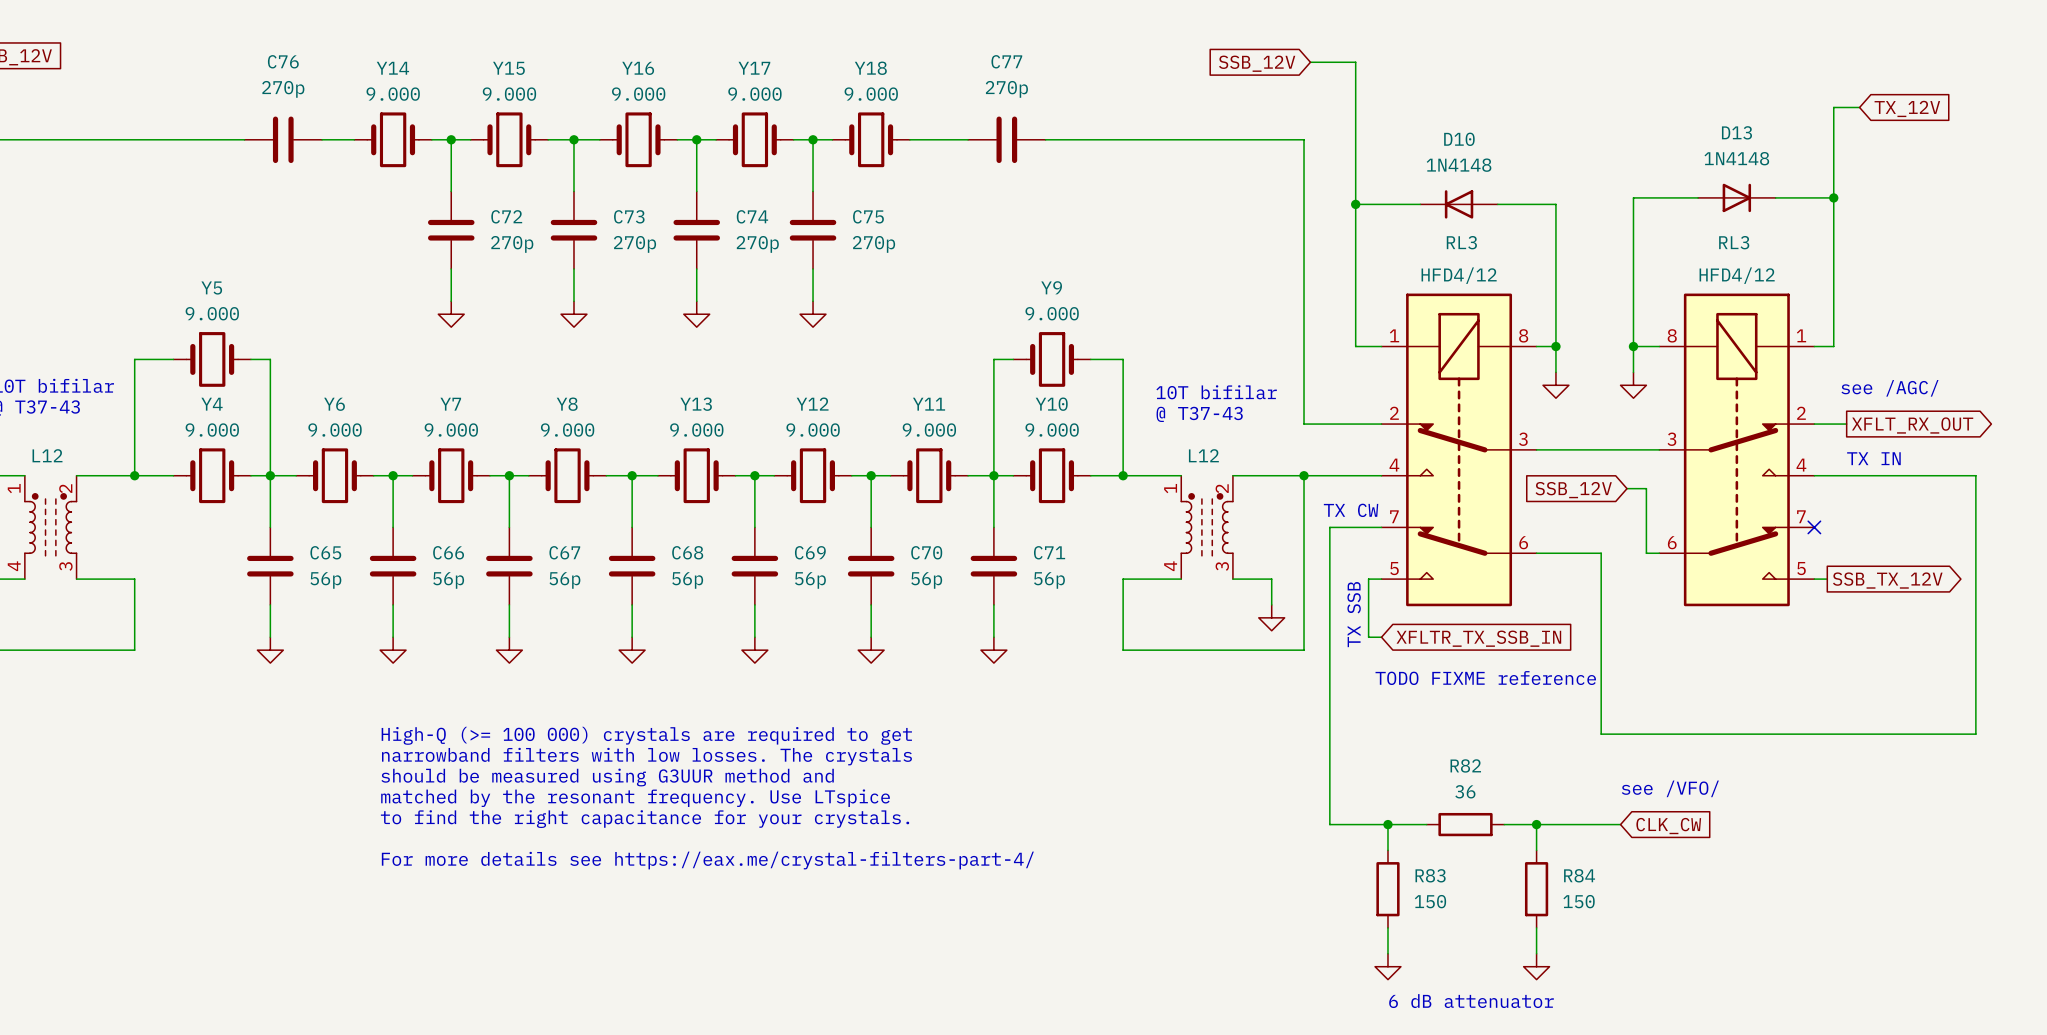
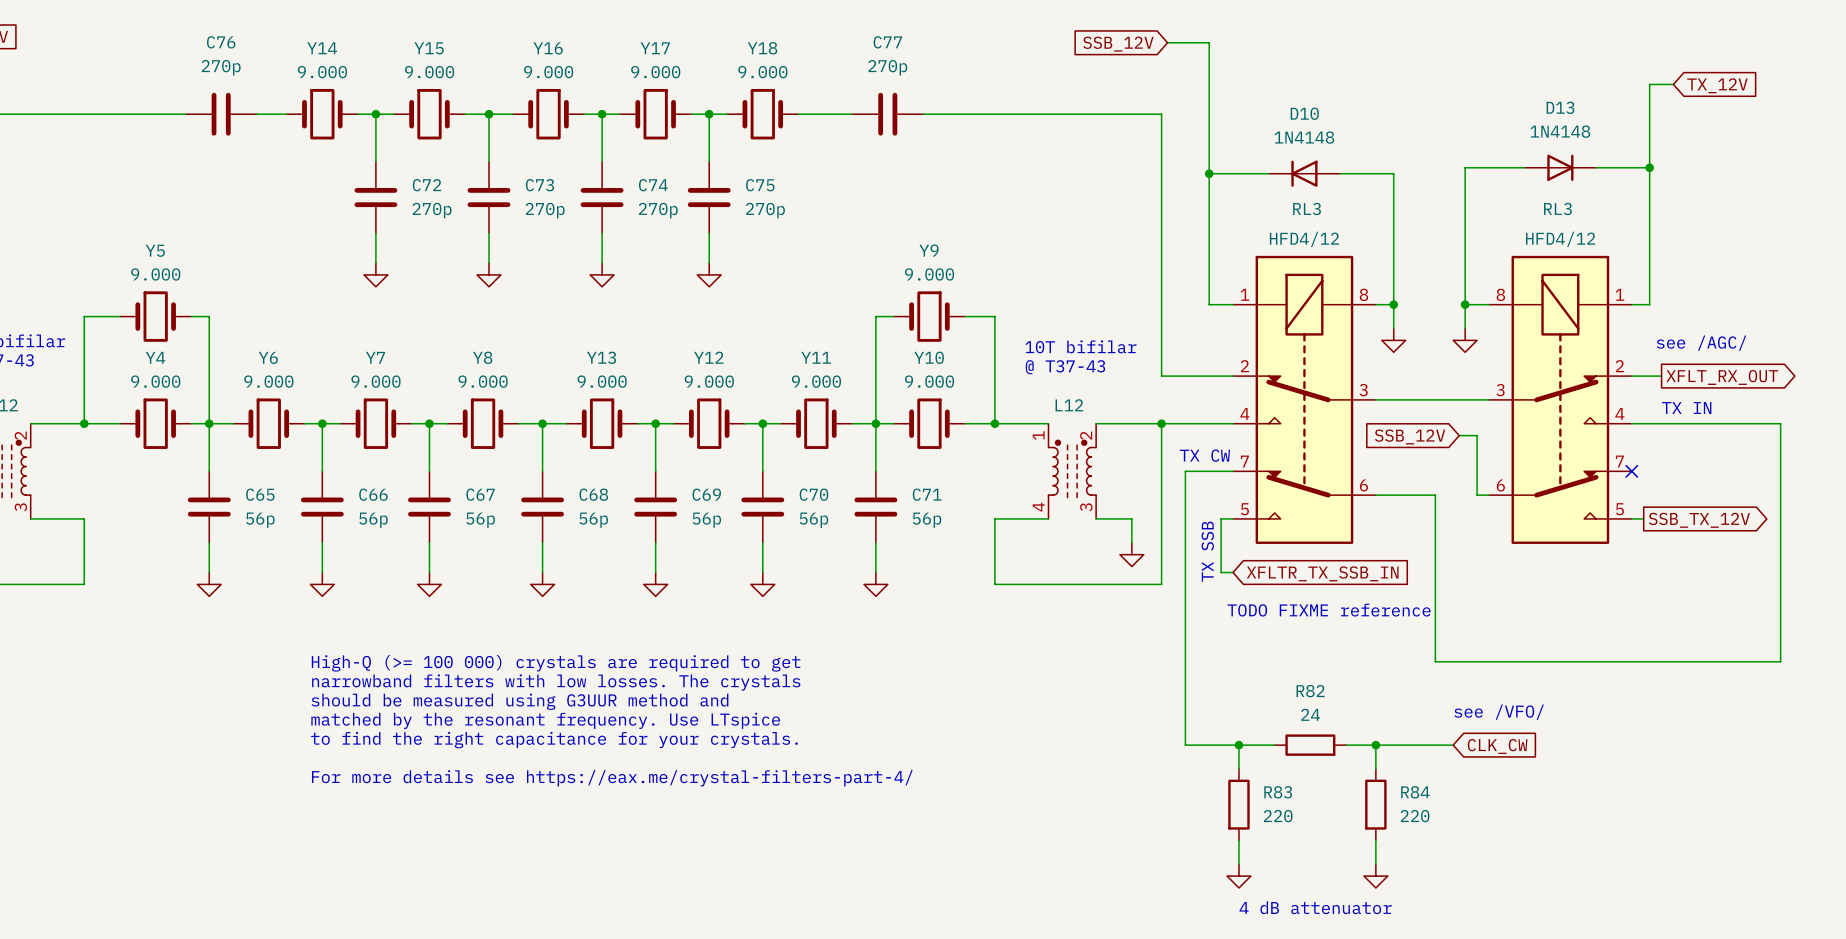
R82 value: 36 (1465, 791) -> 24 (1310, 714)
R83 value: 150 (1430, 901) -> 220 (1278, 816)
R84 value: 150 (1579, 901) -> 220 (1415, 816)
text: 6 dB attenuator (1471, 1001) -> 4 dB attenuator (1315, 907)

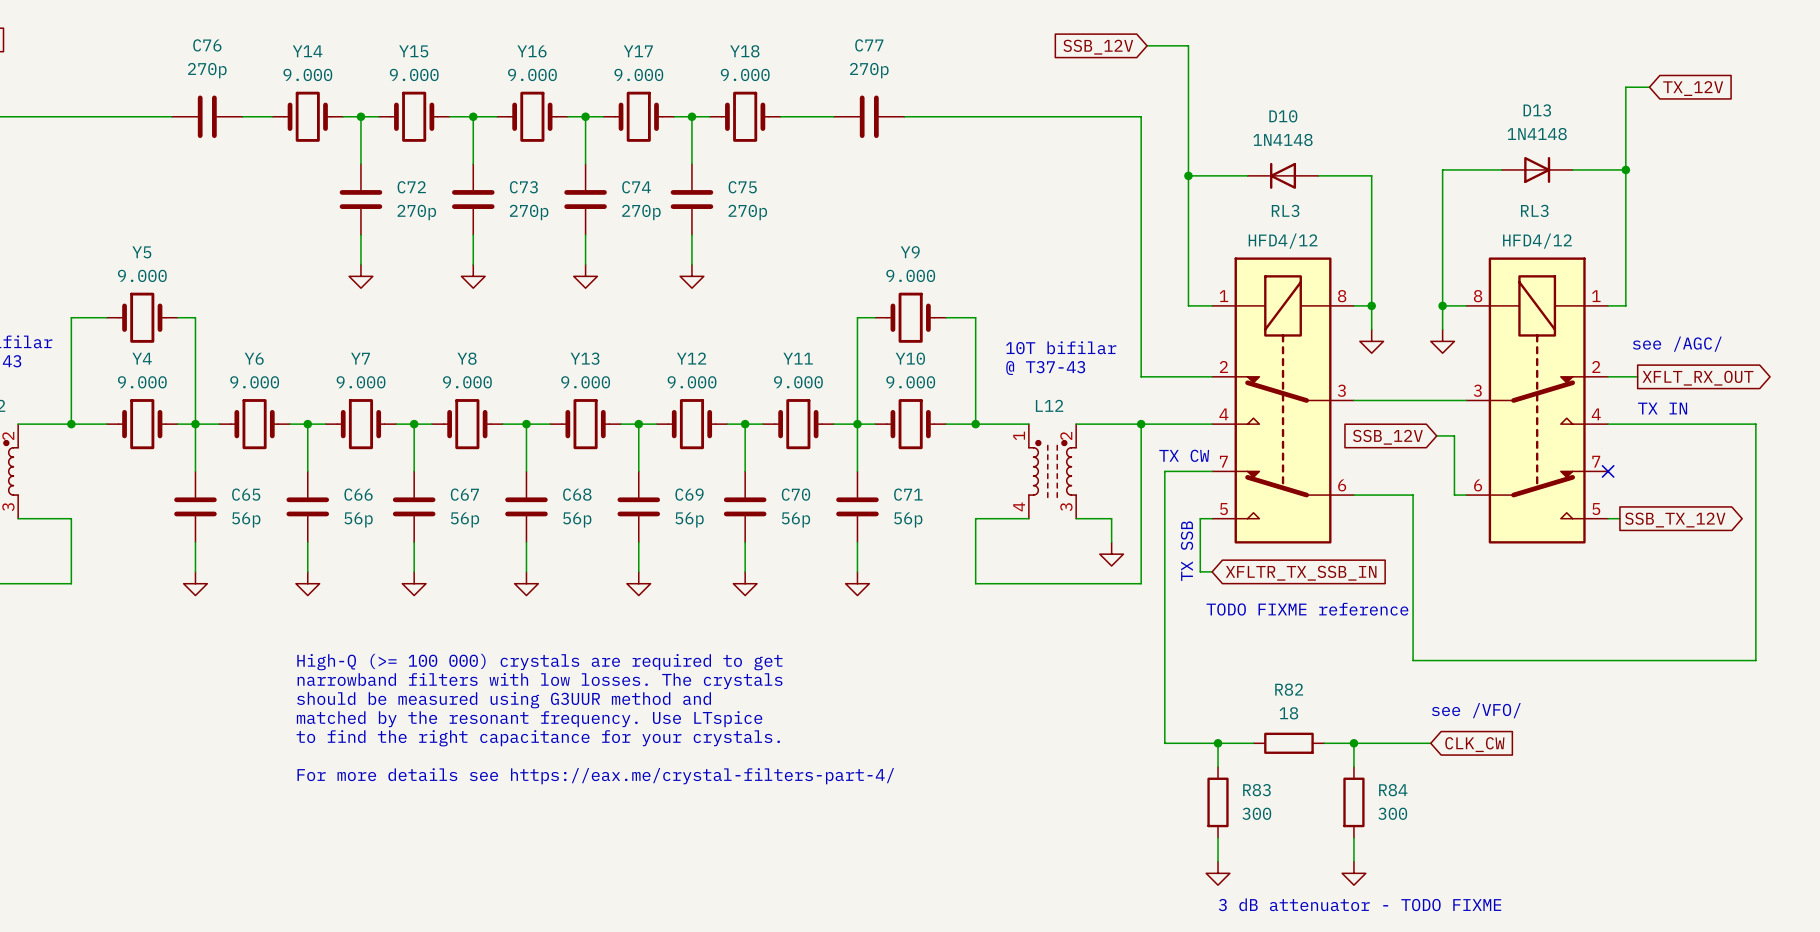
R82 value: 24 (1310, 714) -> 18 (1288, 713)
R83 value: 220 (1278, 816) -> 300 (1256, 813)
R84 value: 220 (1415, 816) -> 300 (1392, 813)
text: 4 dB attenuator (1315, 907) -> 3 dB attenuator - TODO FIXME (1360, 904)

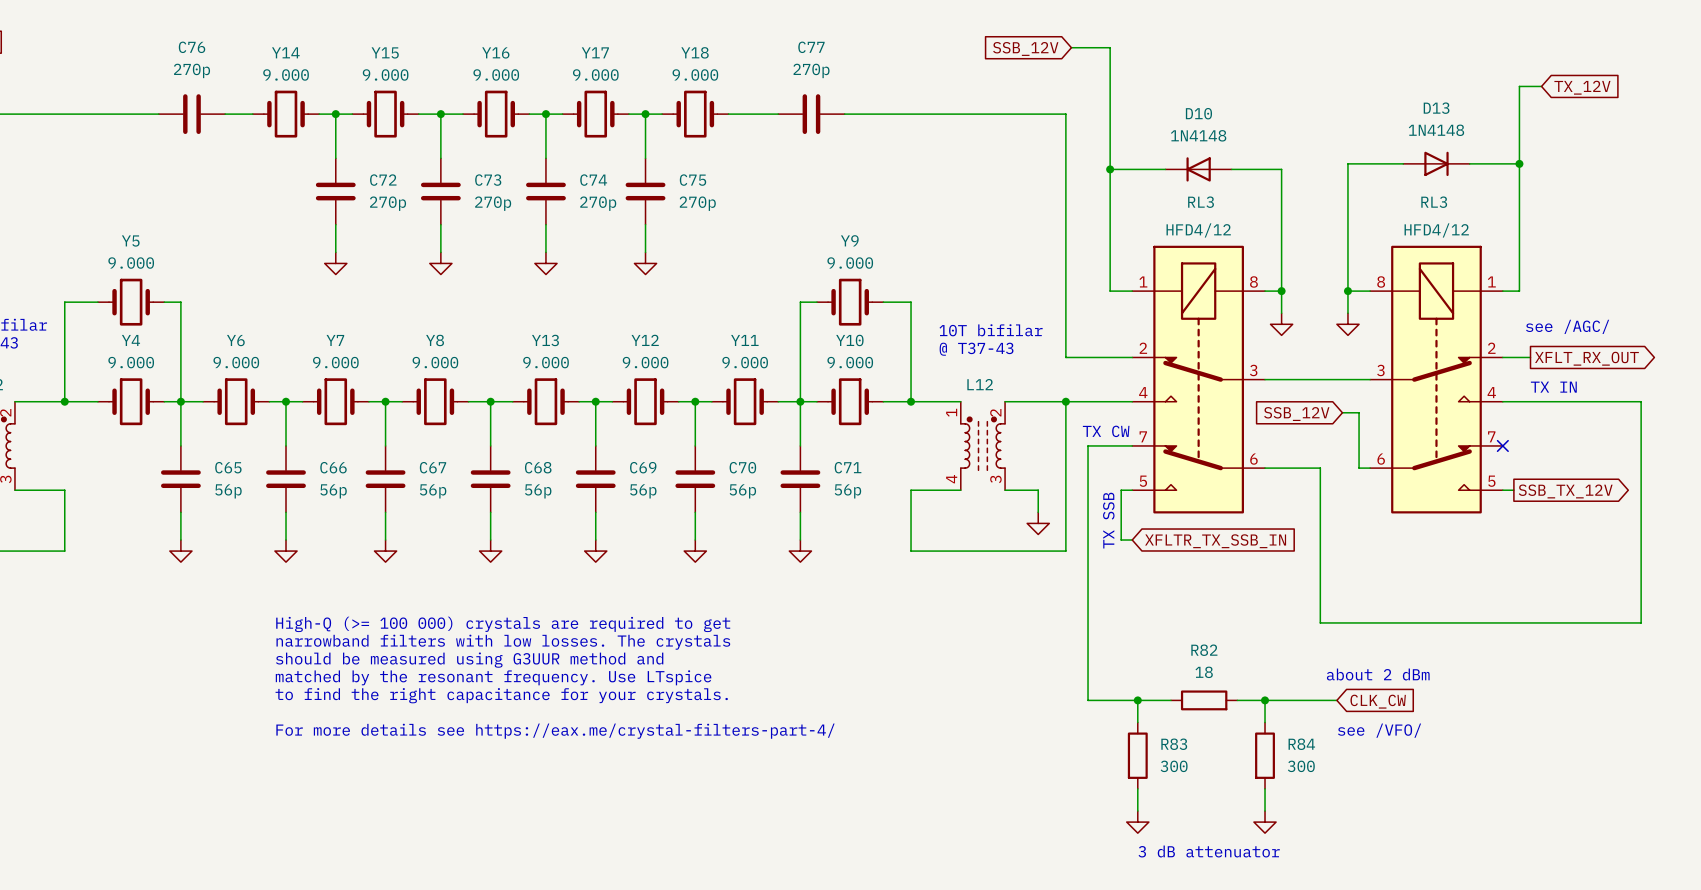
text: TODO FIXME reference (1307, 609) -> none
text position: see /VFO/ (1476, 710) -> see /VFO/ (1379, 730)
text: none -> about 2 dBm (1378, 674)
text: 3 dB attenuator - TODO FIXME (1360, 904) -> 3 dB attenuator (1209, 851)

